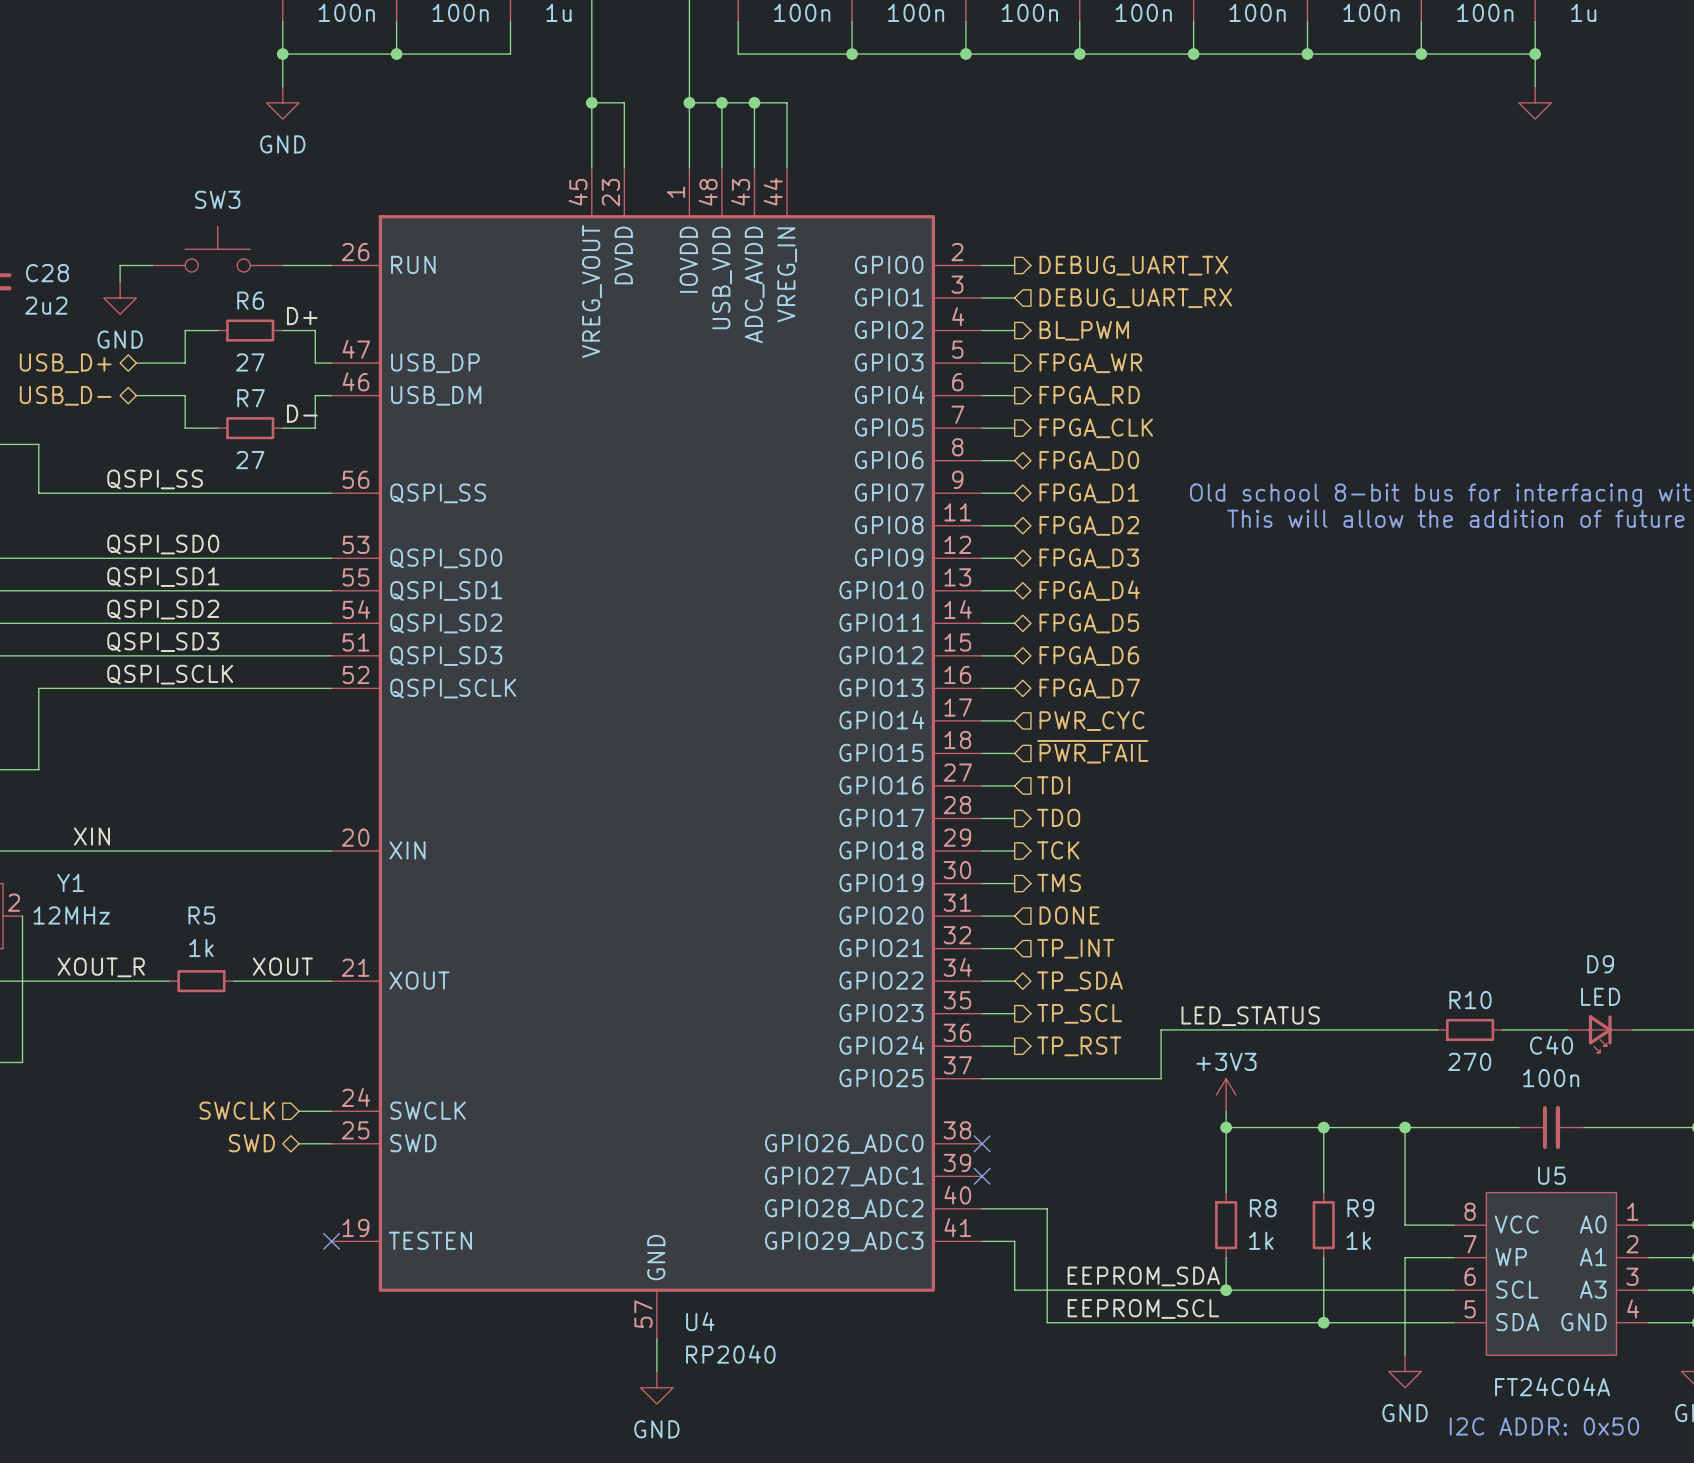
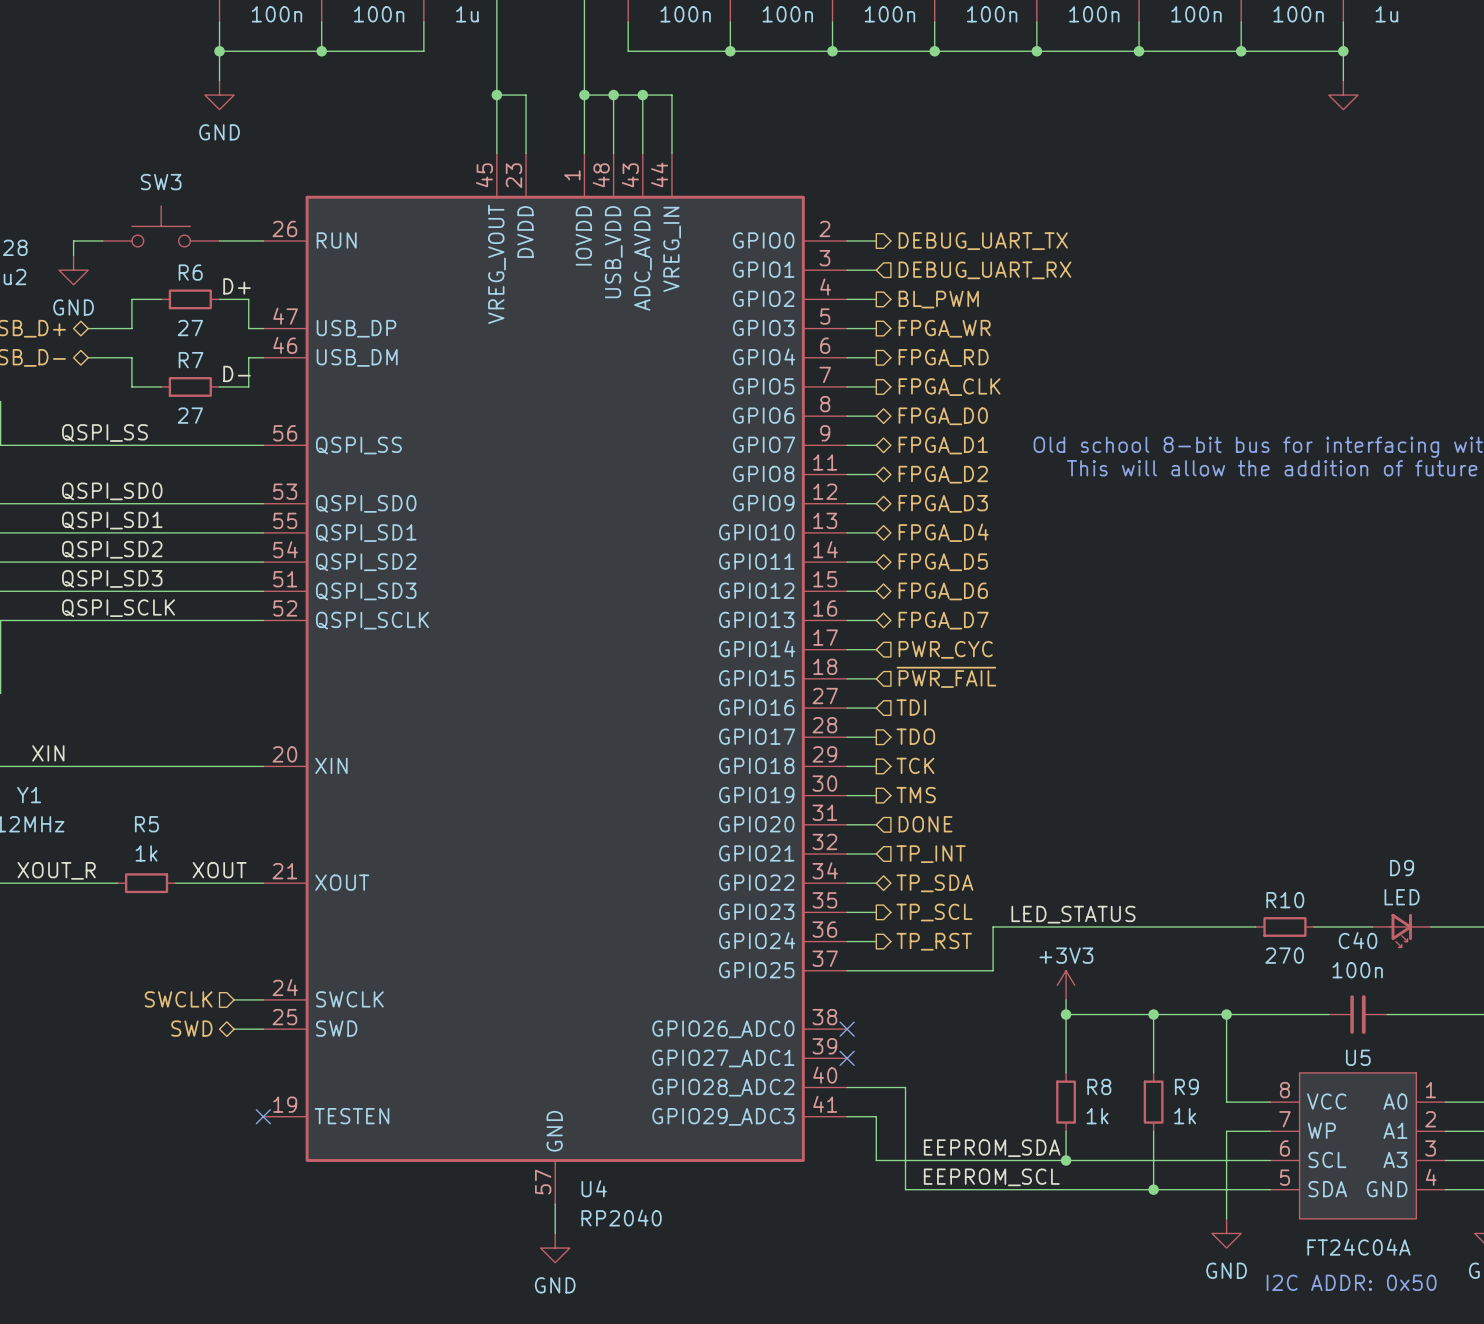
label position: LED_STATUS (1250, 1016) -> LED_STATUS (1073, 914)
wire: (1161, 1029) (1161, 1078) (1144, 1078) -> (1007, 926) (993, 926) (993, 970)

